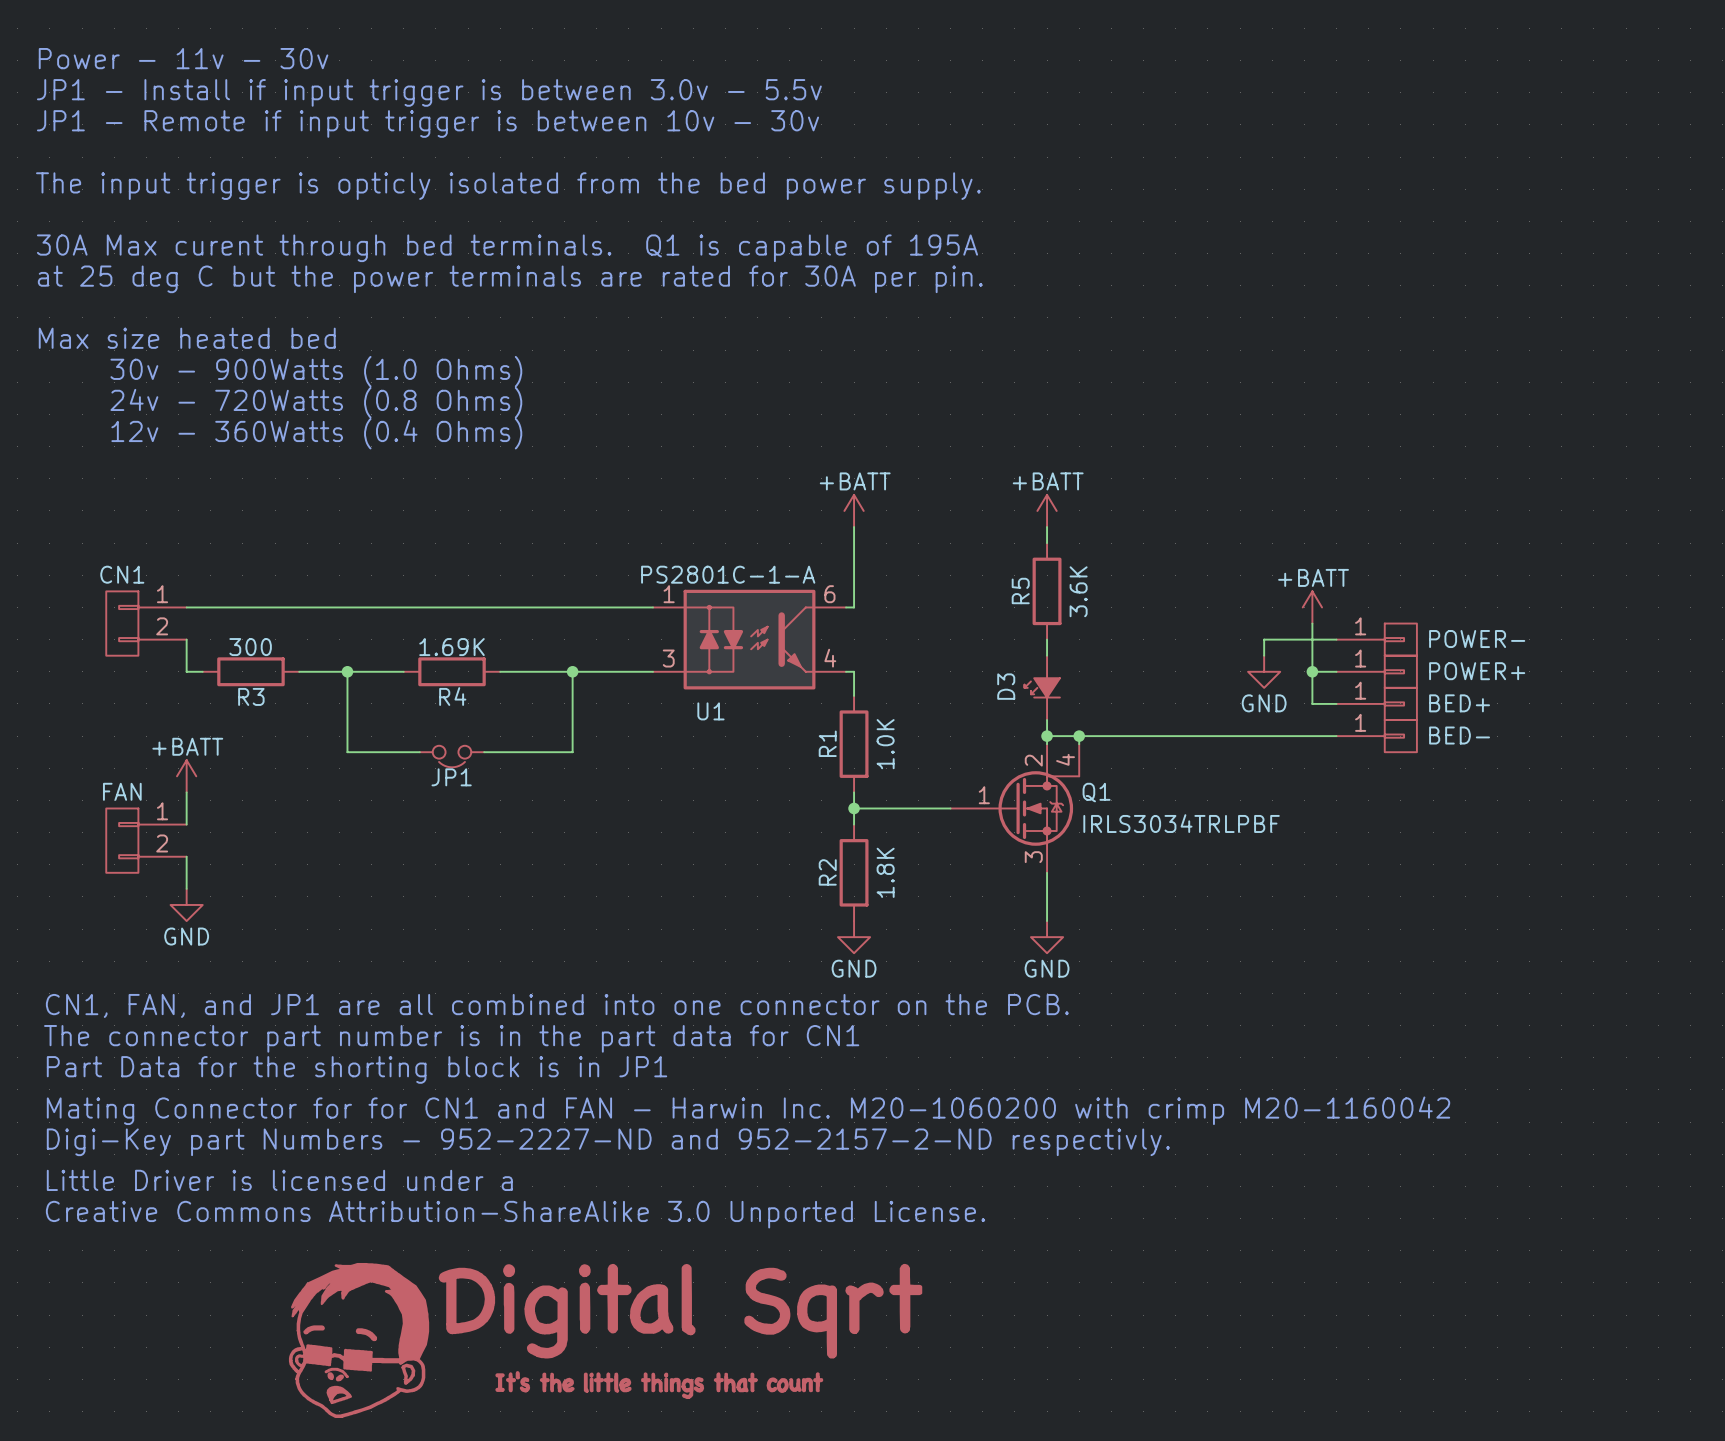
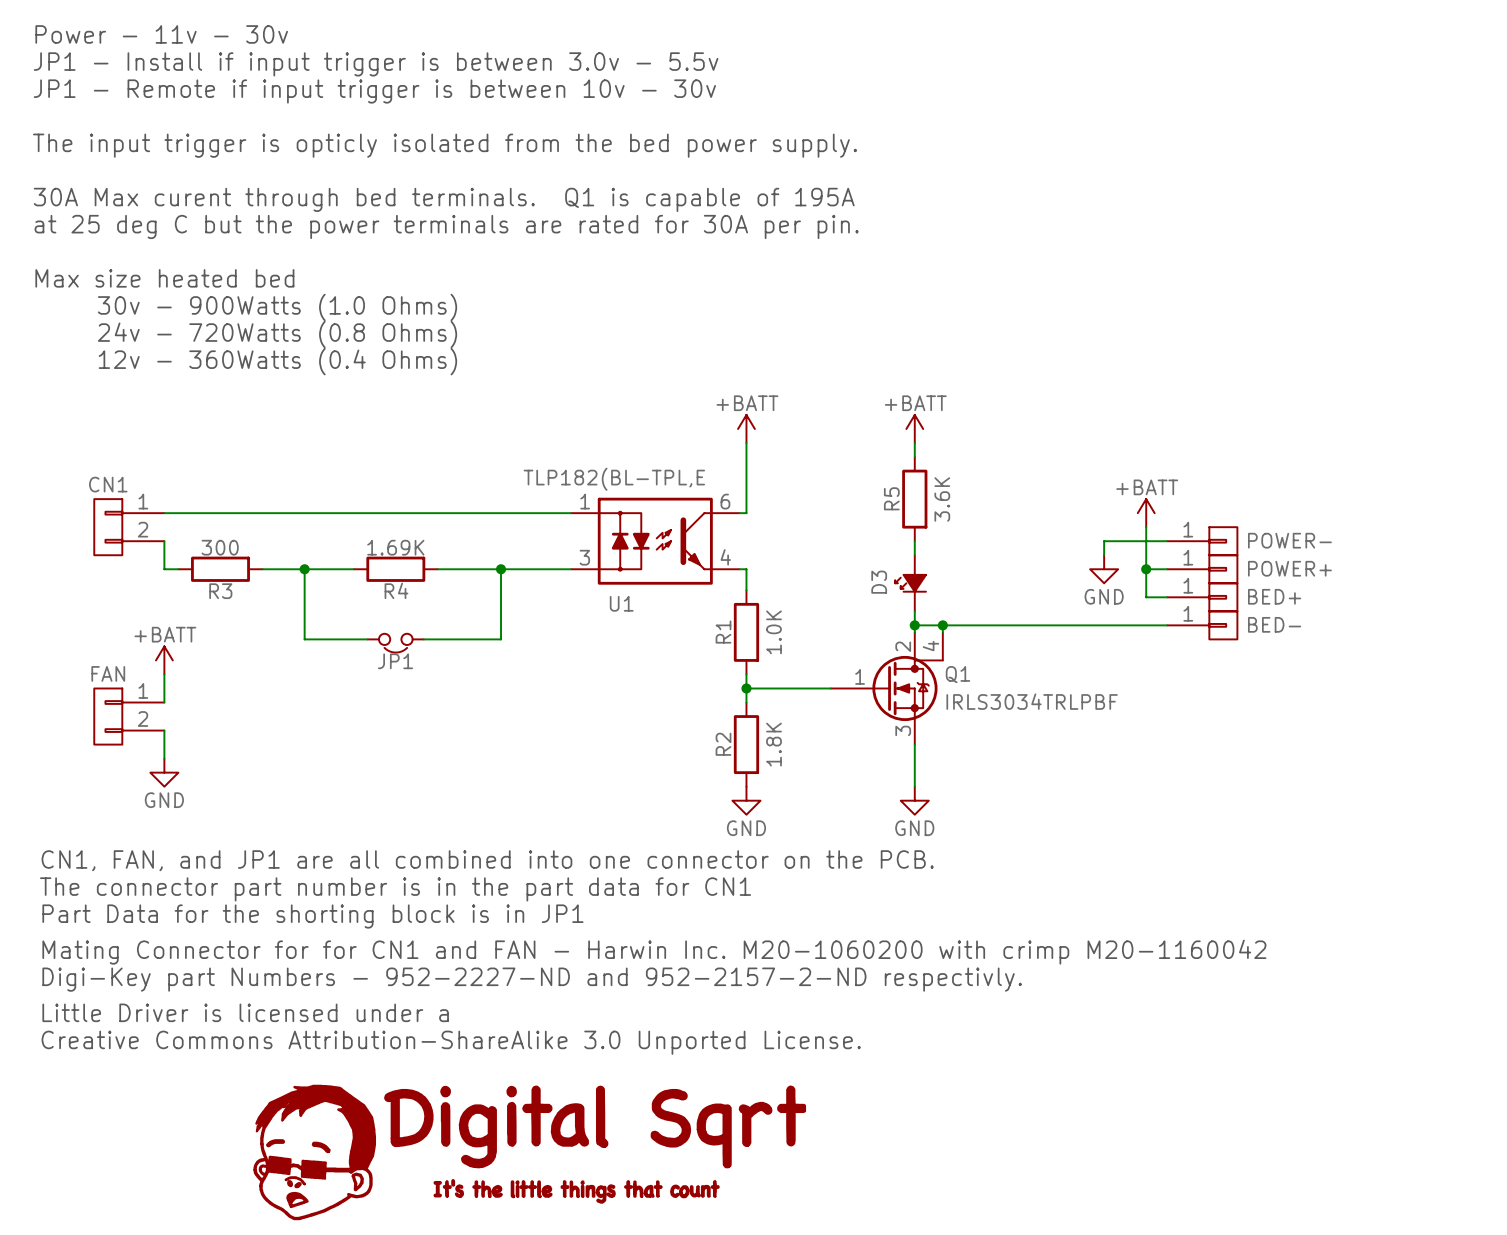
U1 value: PS2801C-1-A (728, 574) -> TLP182(BL-TPL,E (614, 479)

